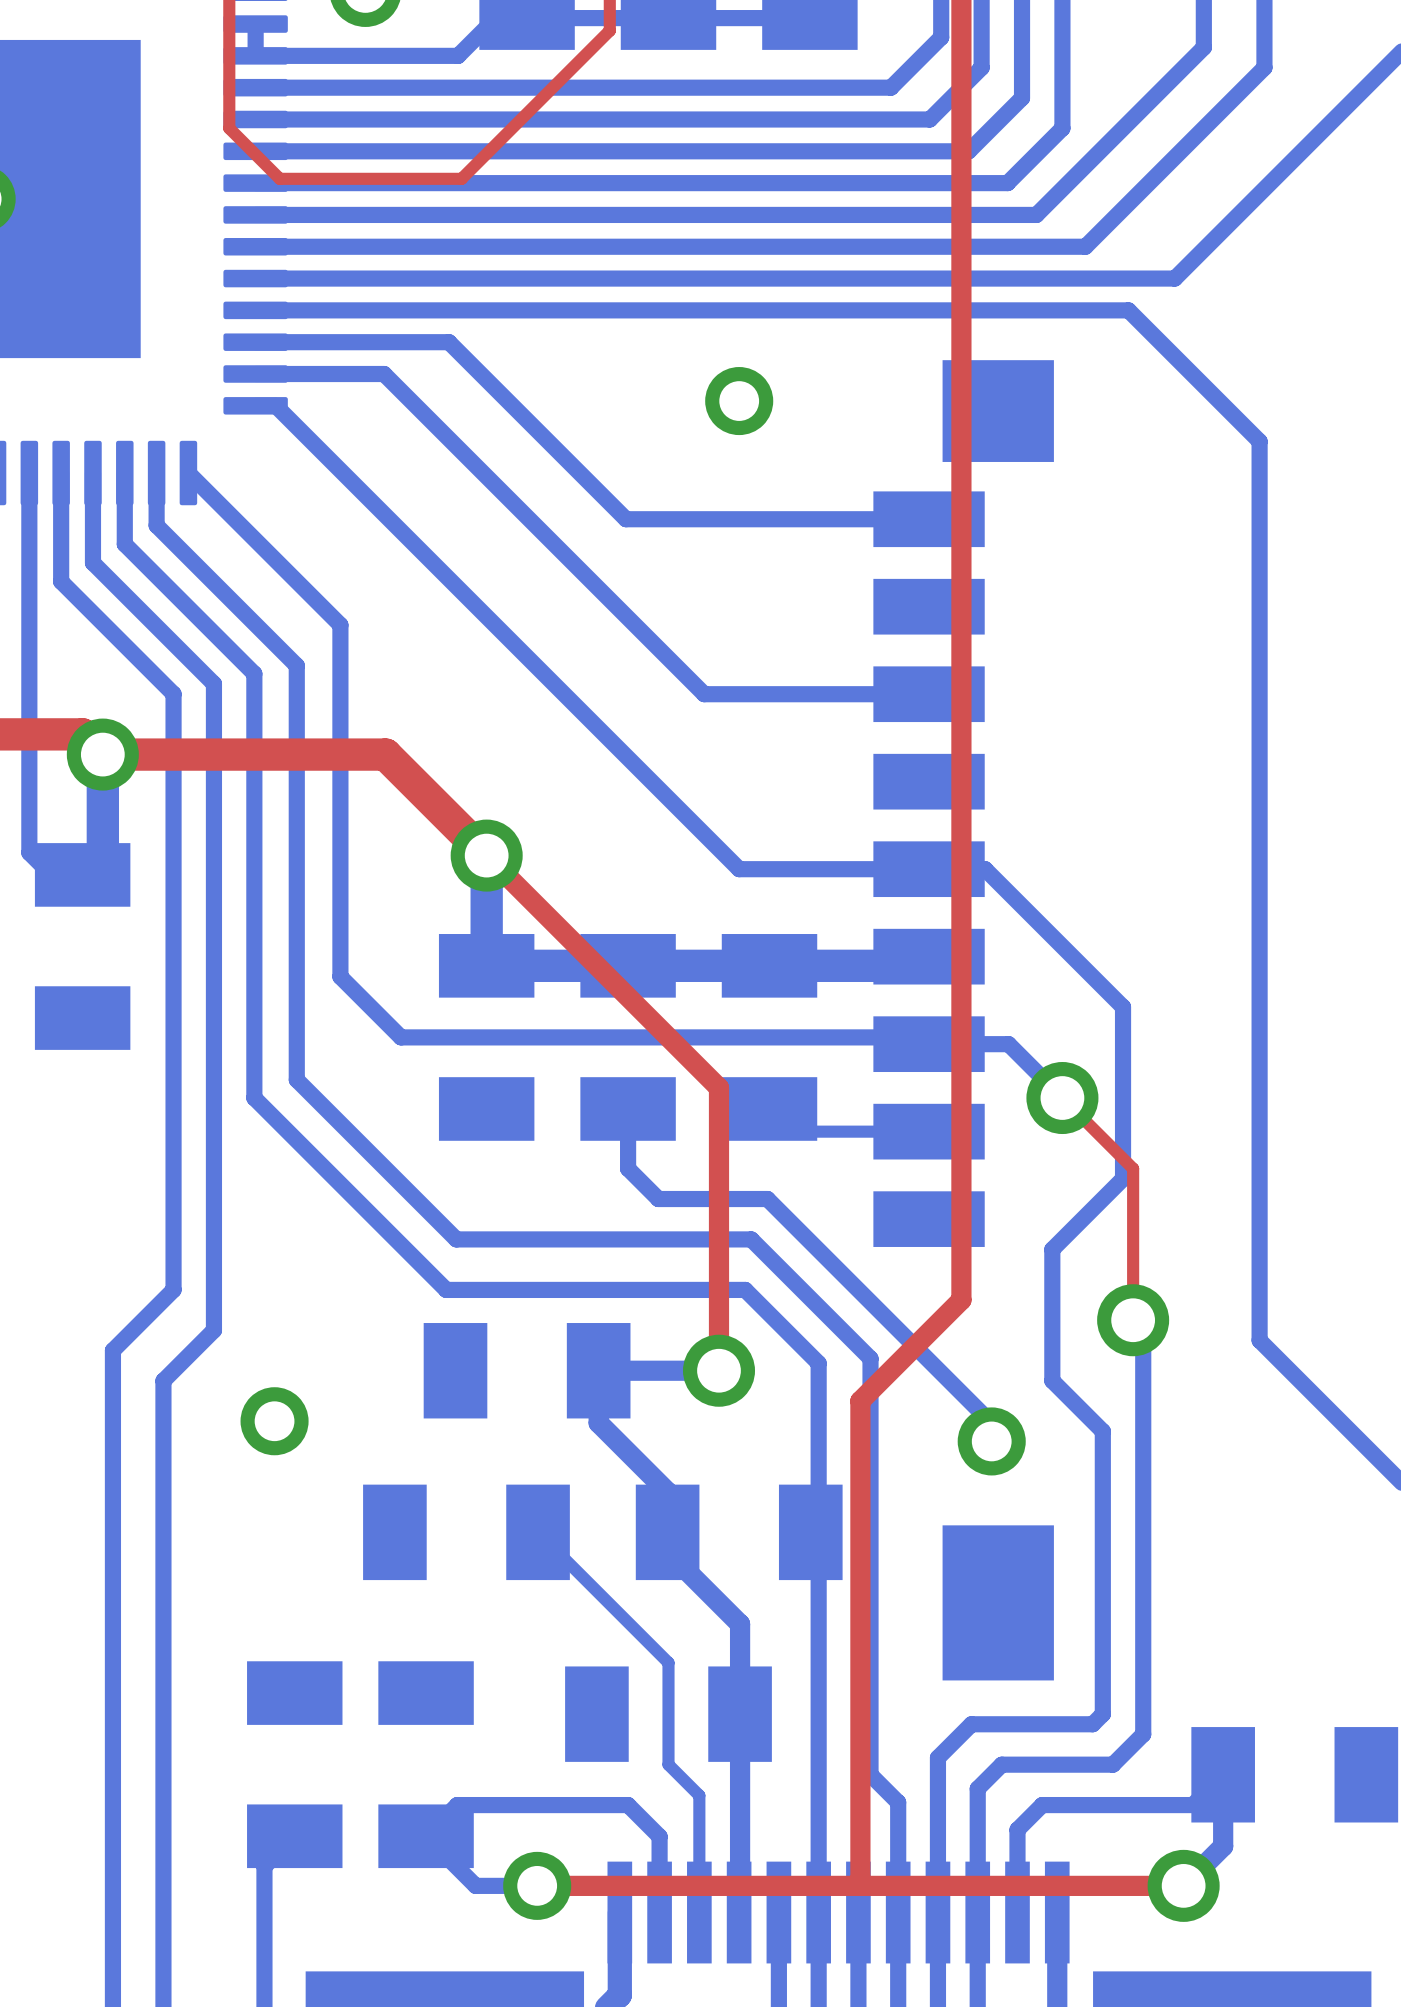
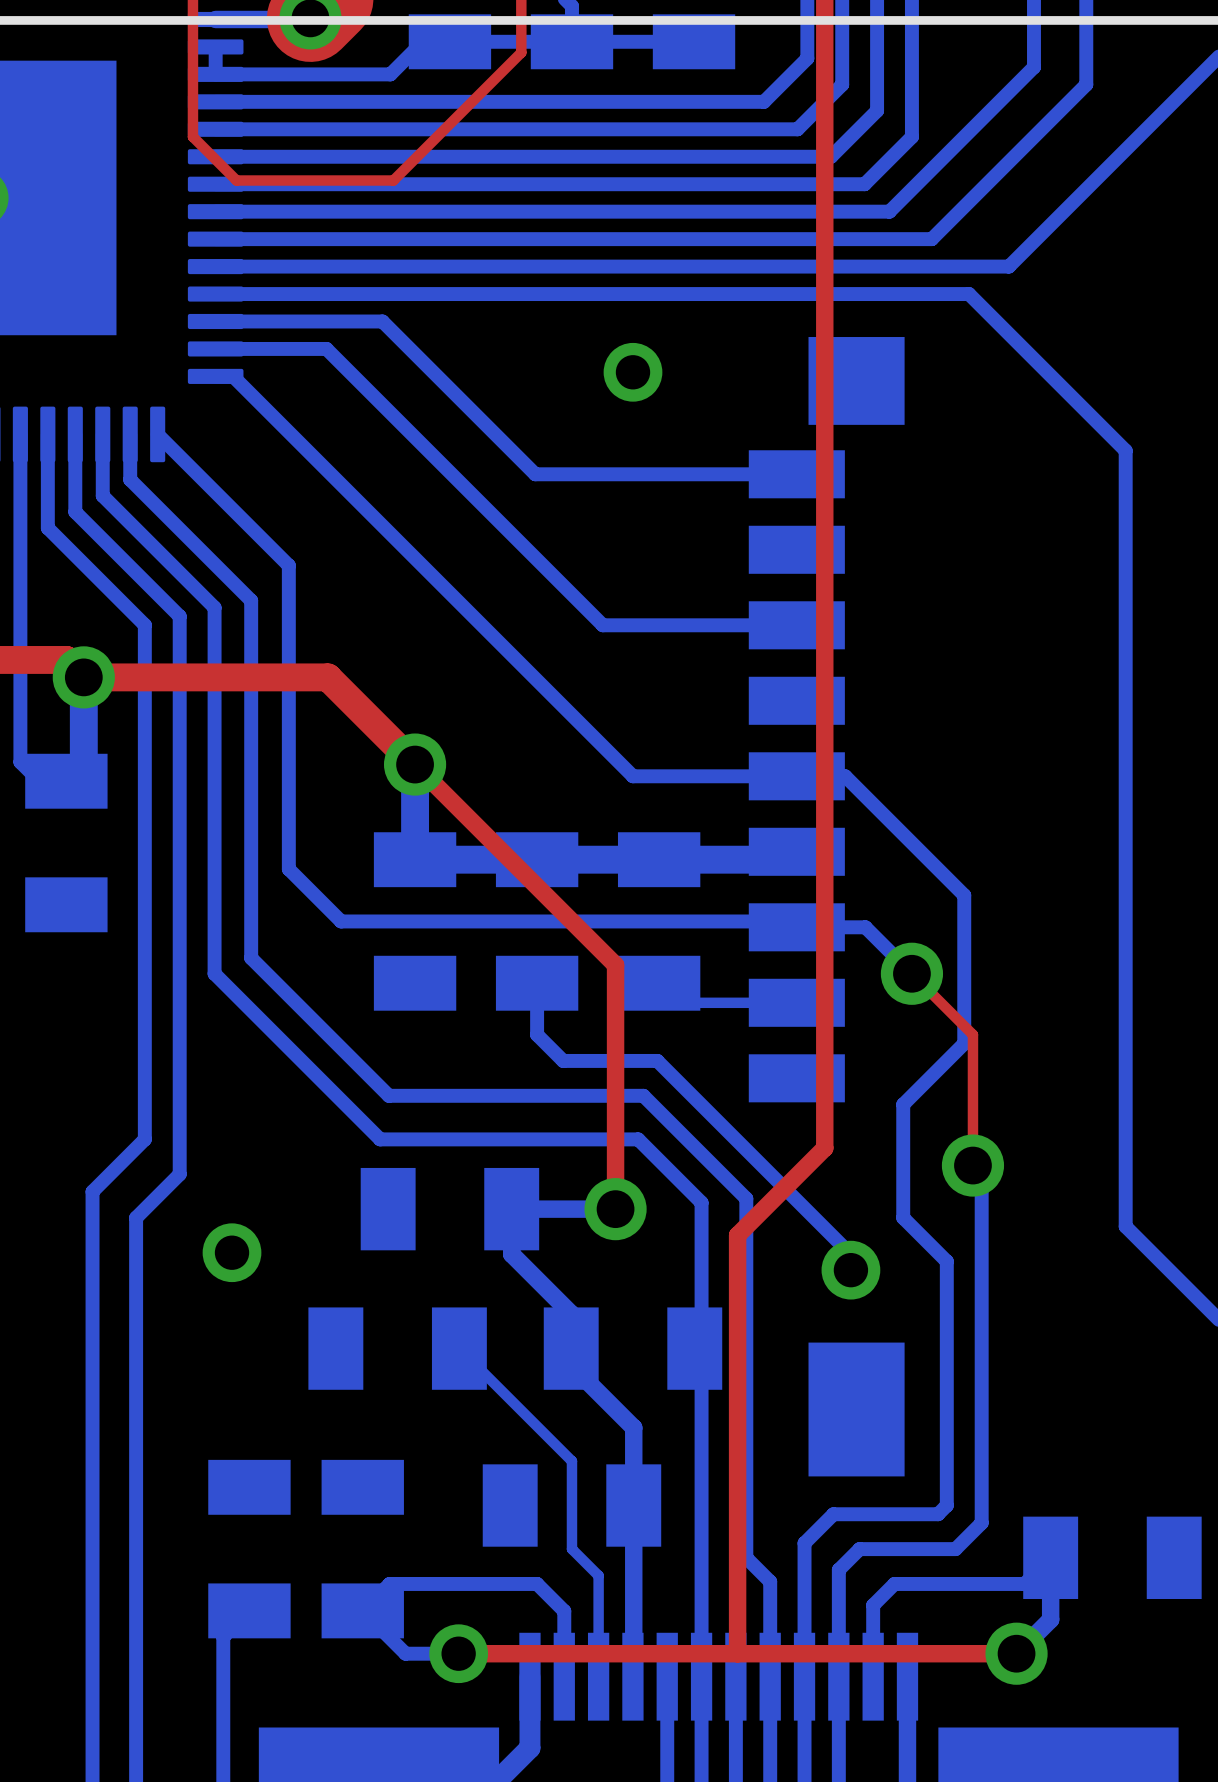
bottom track: (1259, 441) (1259, 1340) (1310, 1390) -> (1082, 407) (1125, 450) (1125, 1226)

